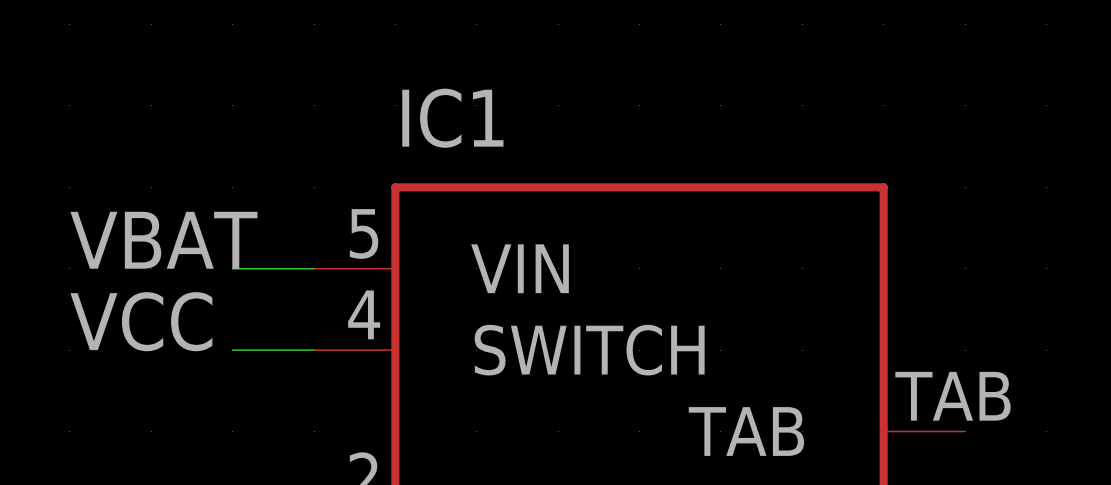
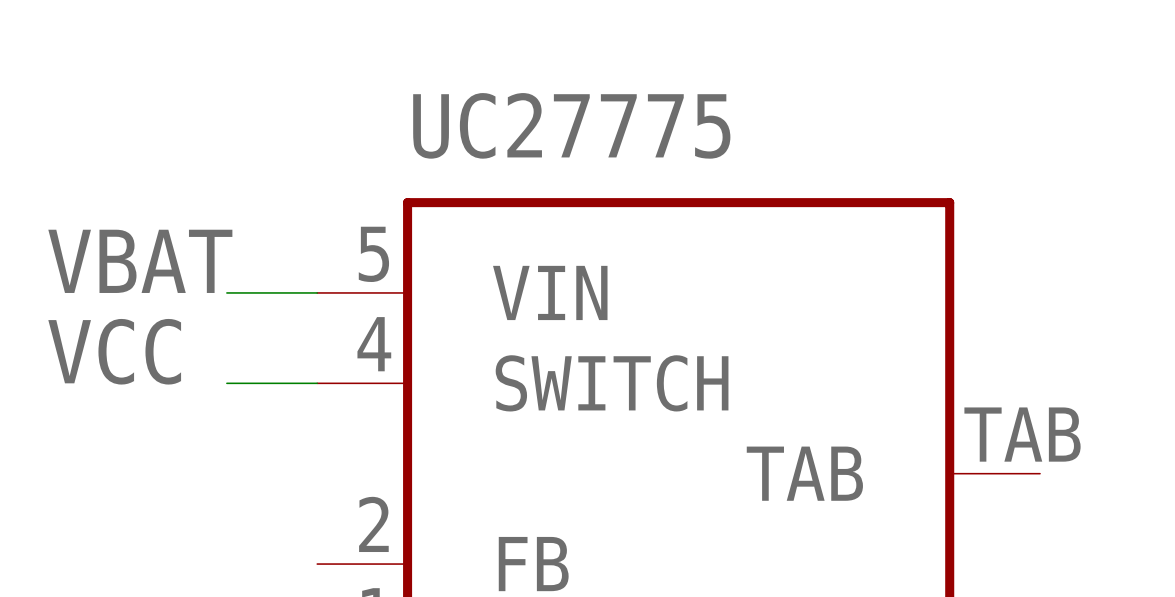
IC1 name: IC1 (452, 118) -> UC27775 (571, 125)

